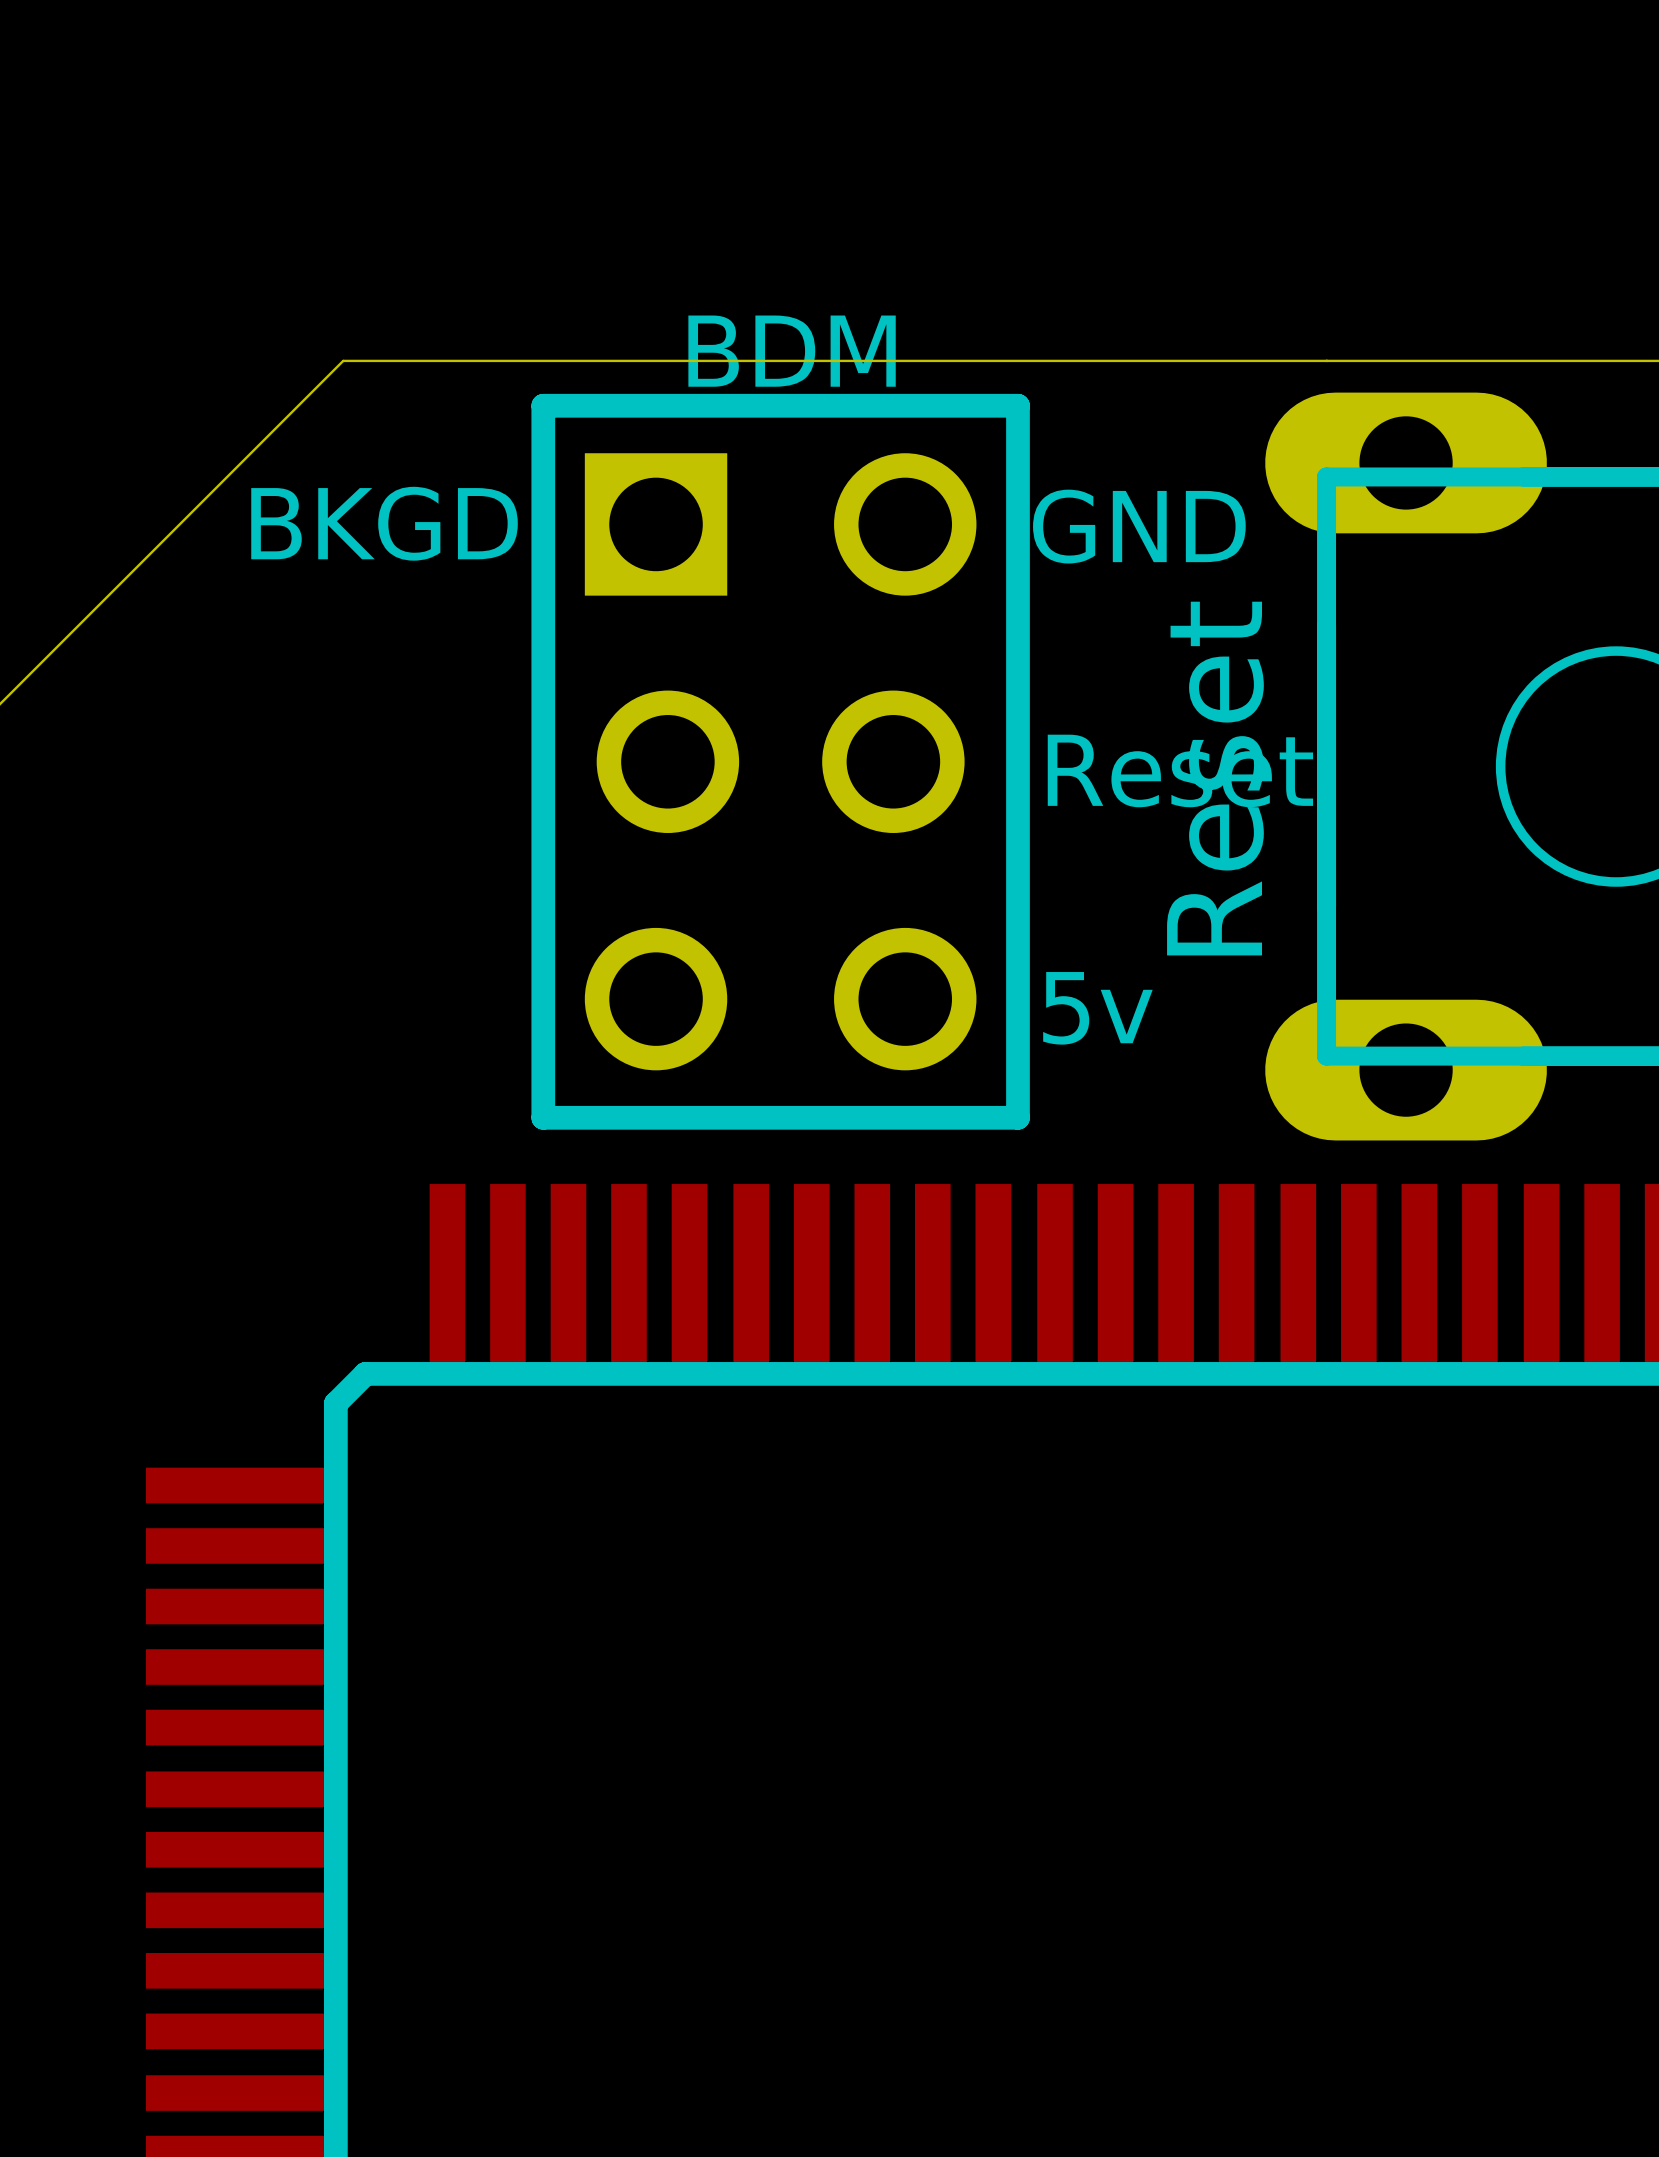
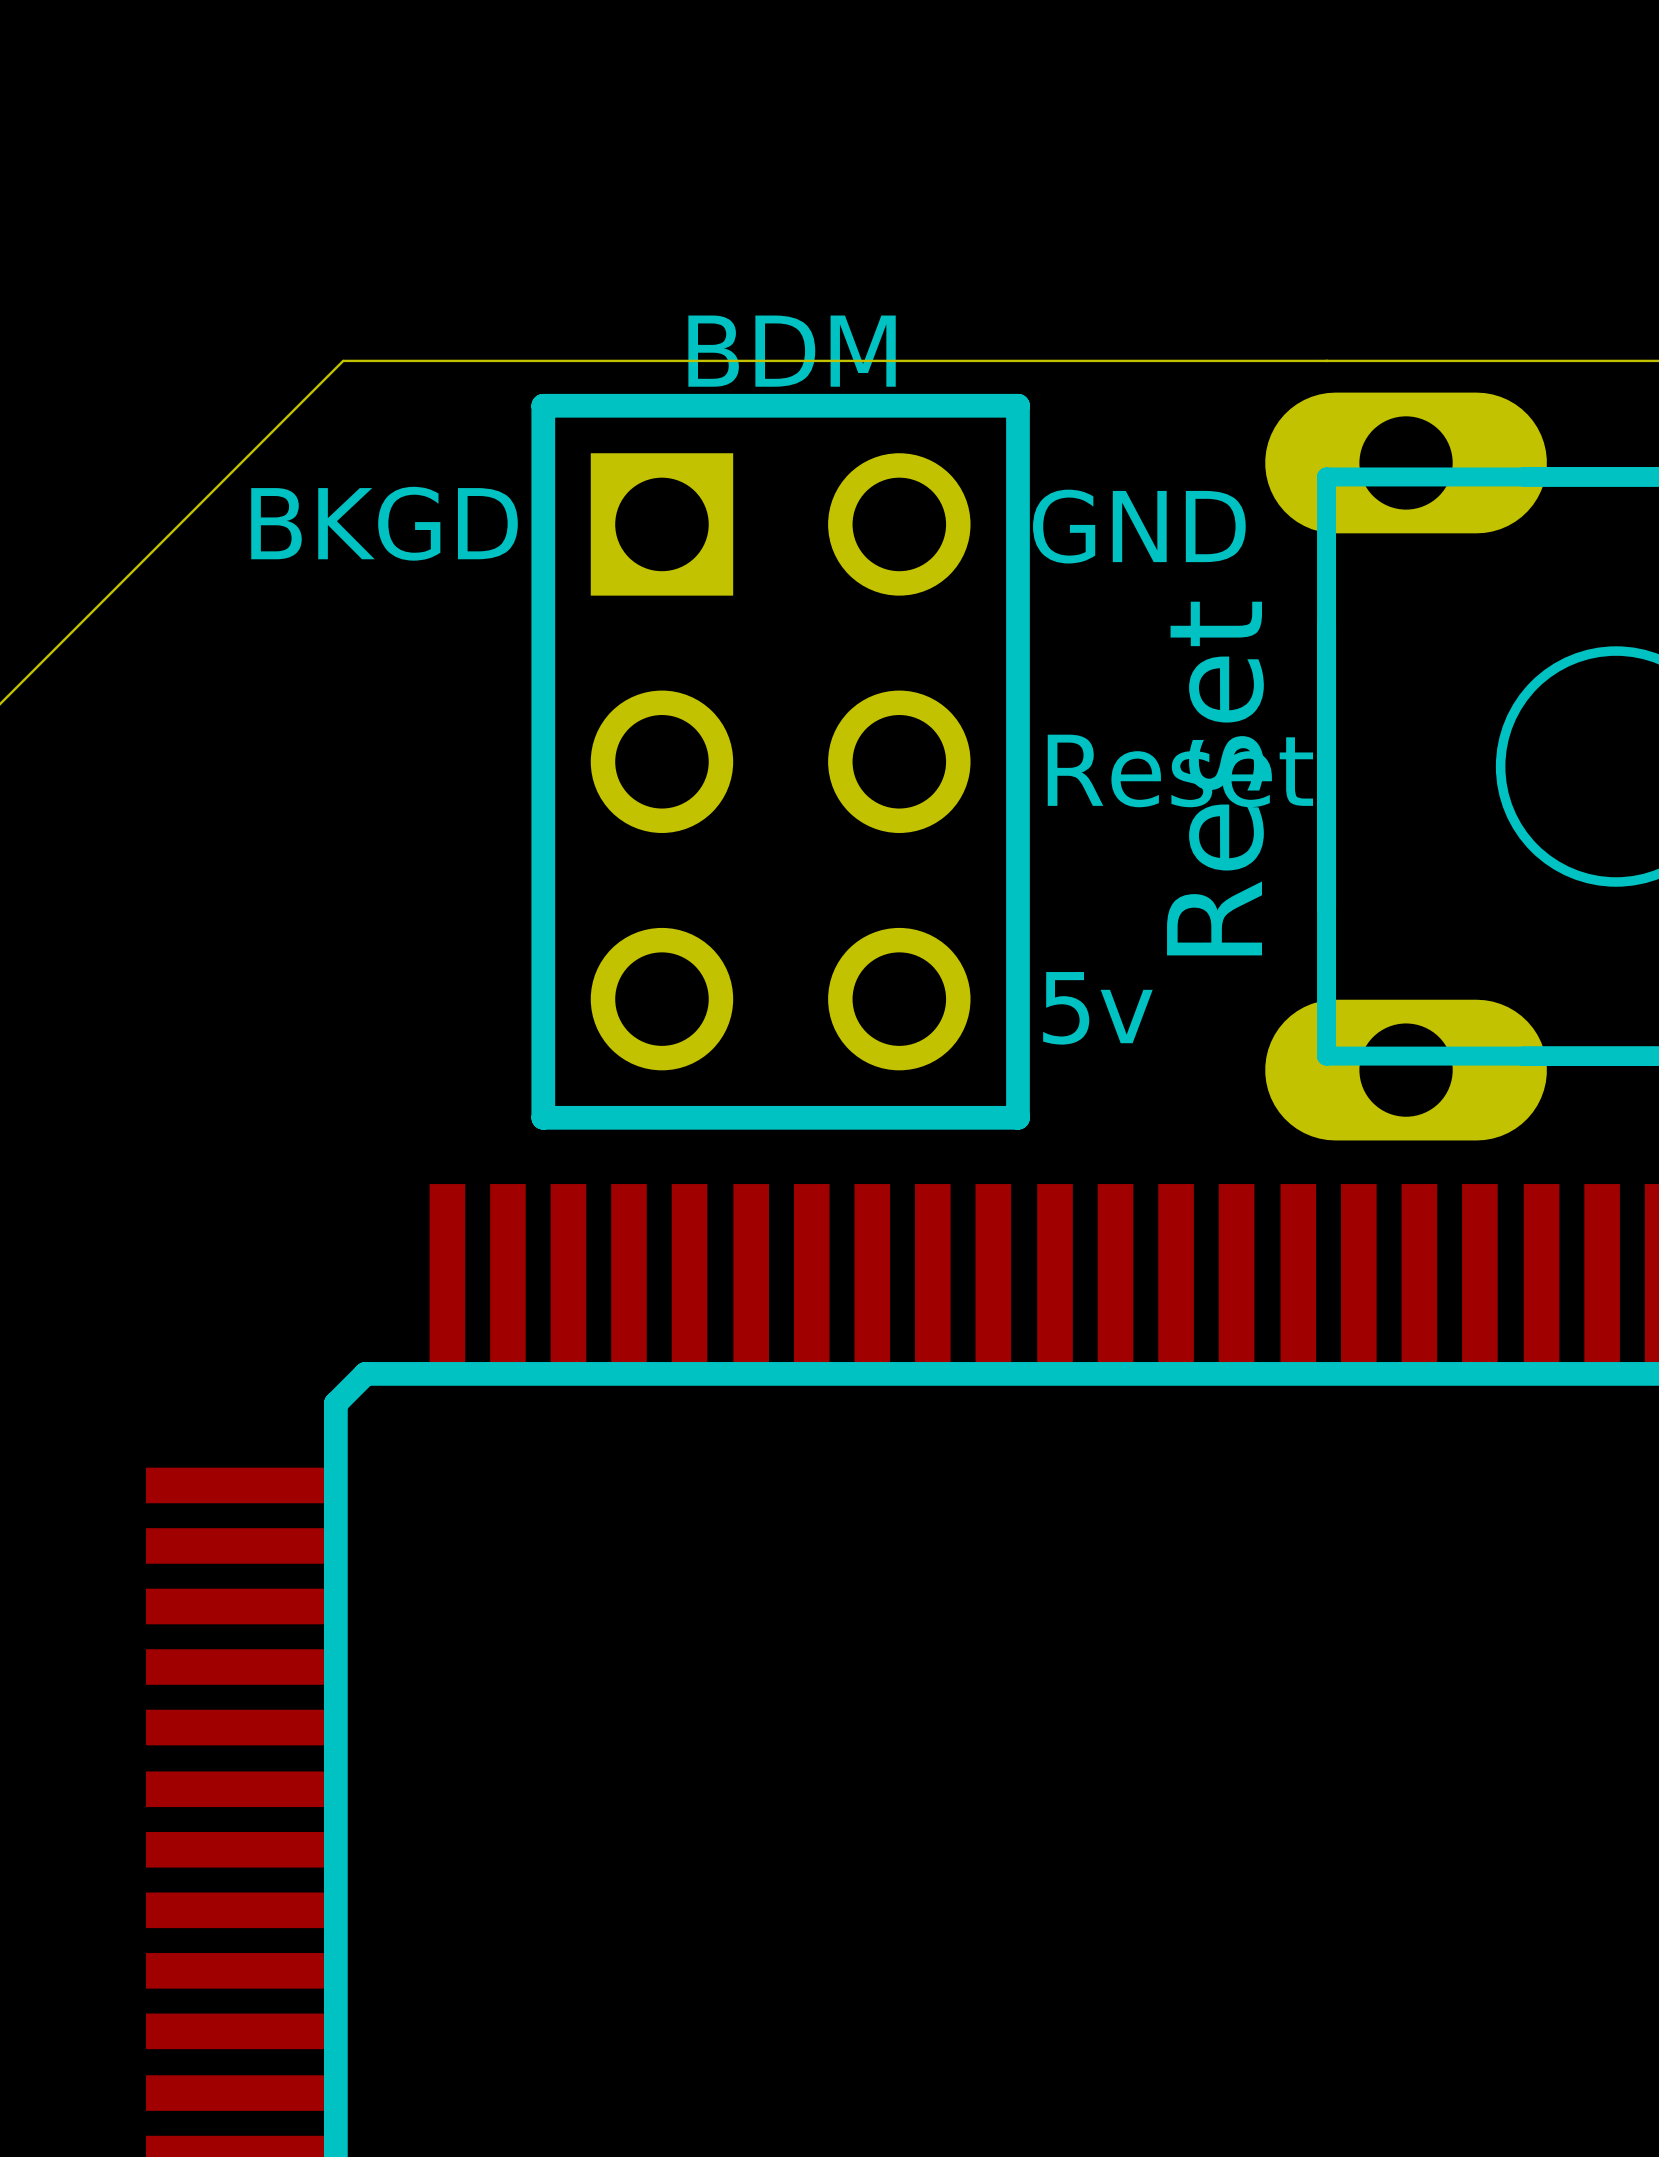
part footprint: [531, 393, 1030, 1130] -> [531, 393, 1030, 1130]

